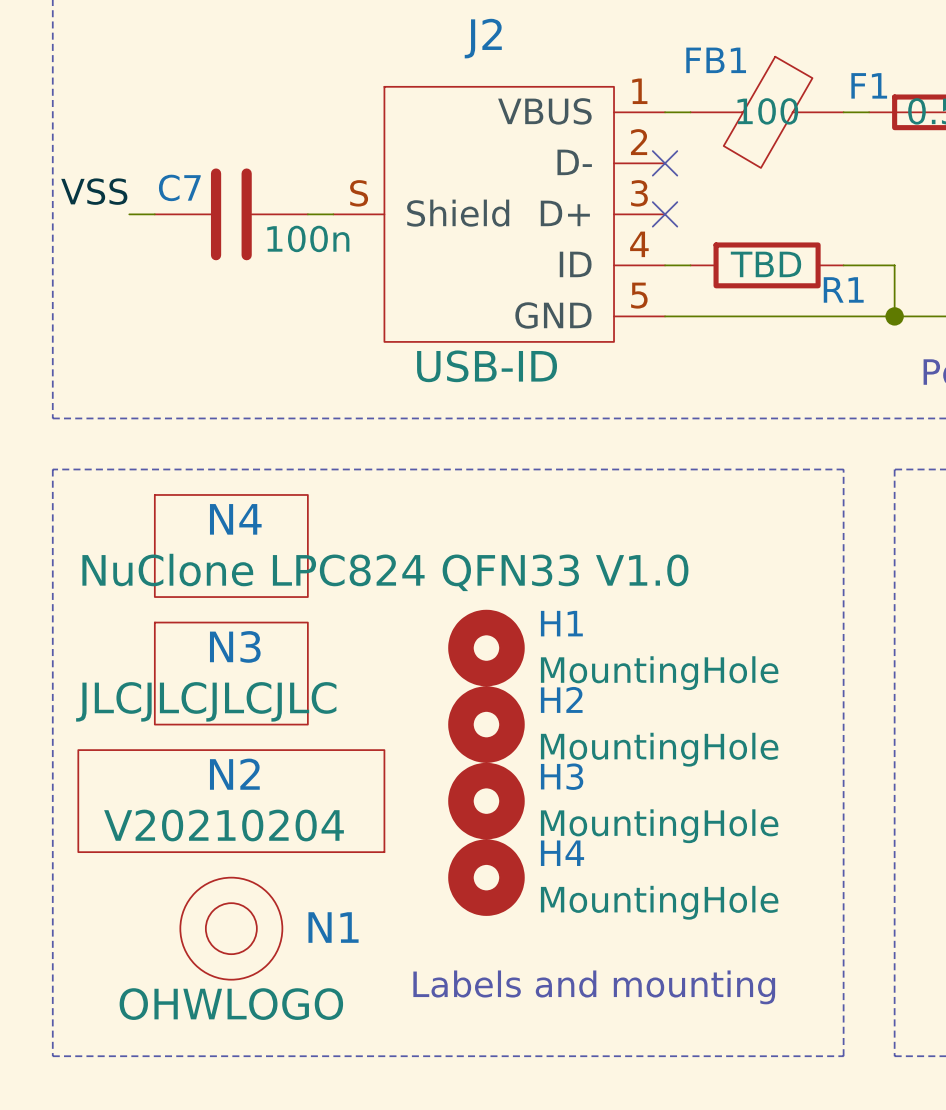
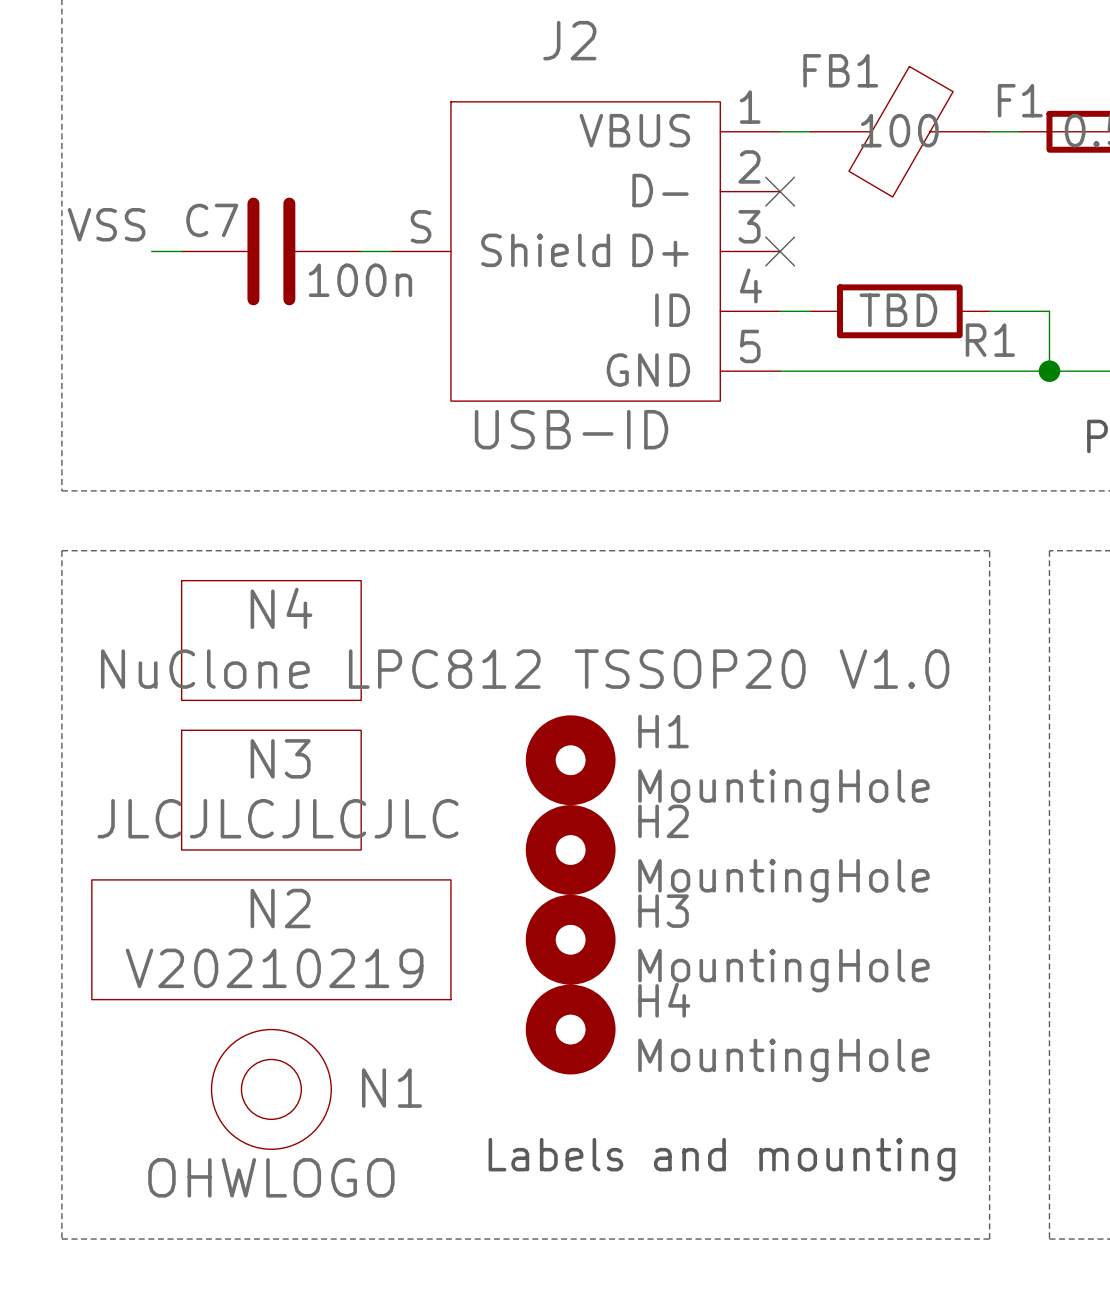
N4 value: NuClone LPC824 QFN33 V1.0 (385, 572) -> NuClone LPC812 TSSOP20 V1.0 (525, 669)
N2 value: V20210204 (224, 825) -> V20210219 (274, 968)

